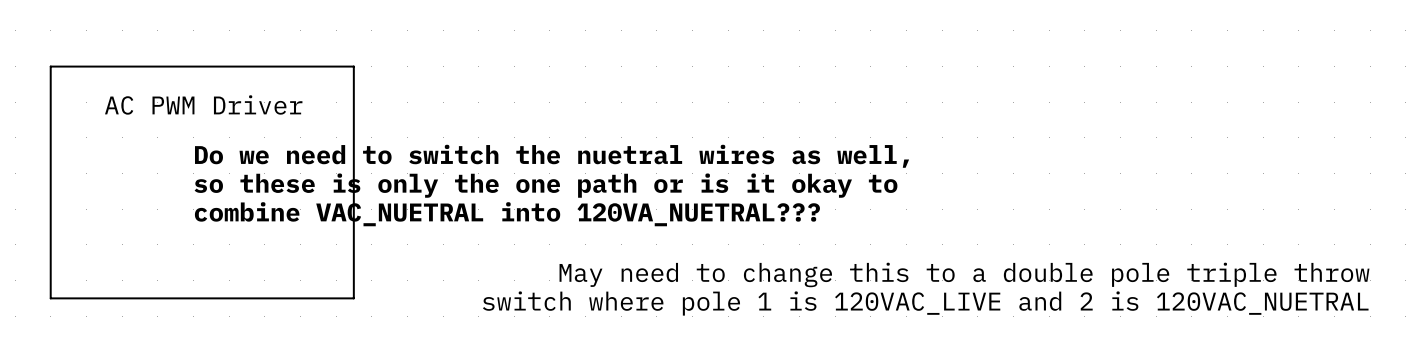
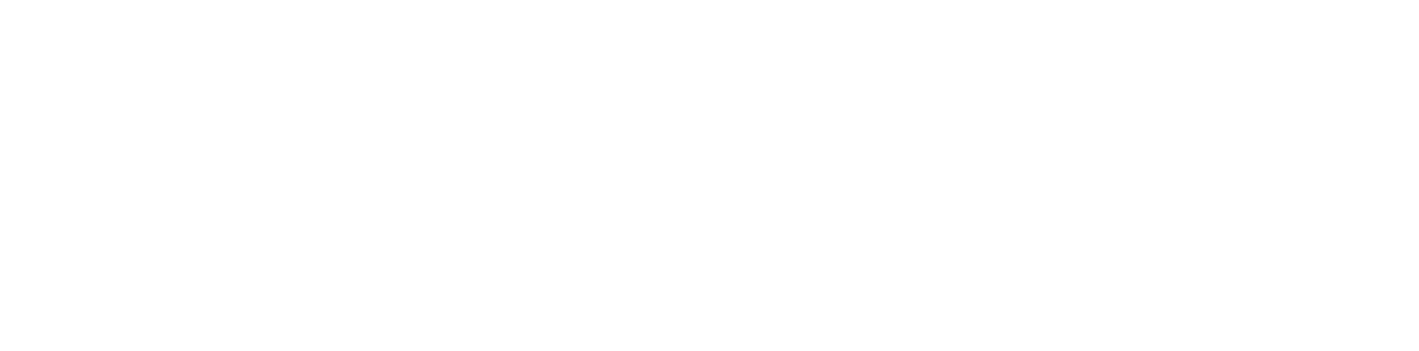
line: (50, 66) (353, 66) (353, 298) (50, 298) (50, 66) -> none
text: AC PWM Driver (203, 104) -> none
text: Do we need to switch the nuetral wires as well, (552, 156) -> none
text: so these is only the one path or is it okay to (546, 185) -> none
text: combine VAC_NUETRAL into 120VA_NUETRAL??? (507, 214) -> none
text: May need to change this to a double pole triple throw (964, 274) -> none
text: switch where pole 1 is 120VAC_LIVE and 2 is 120VAC_NUETRAL (925, 303) -> none

